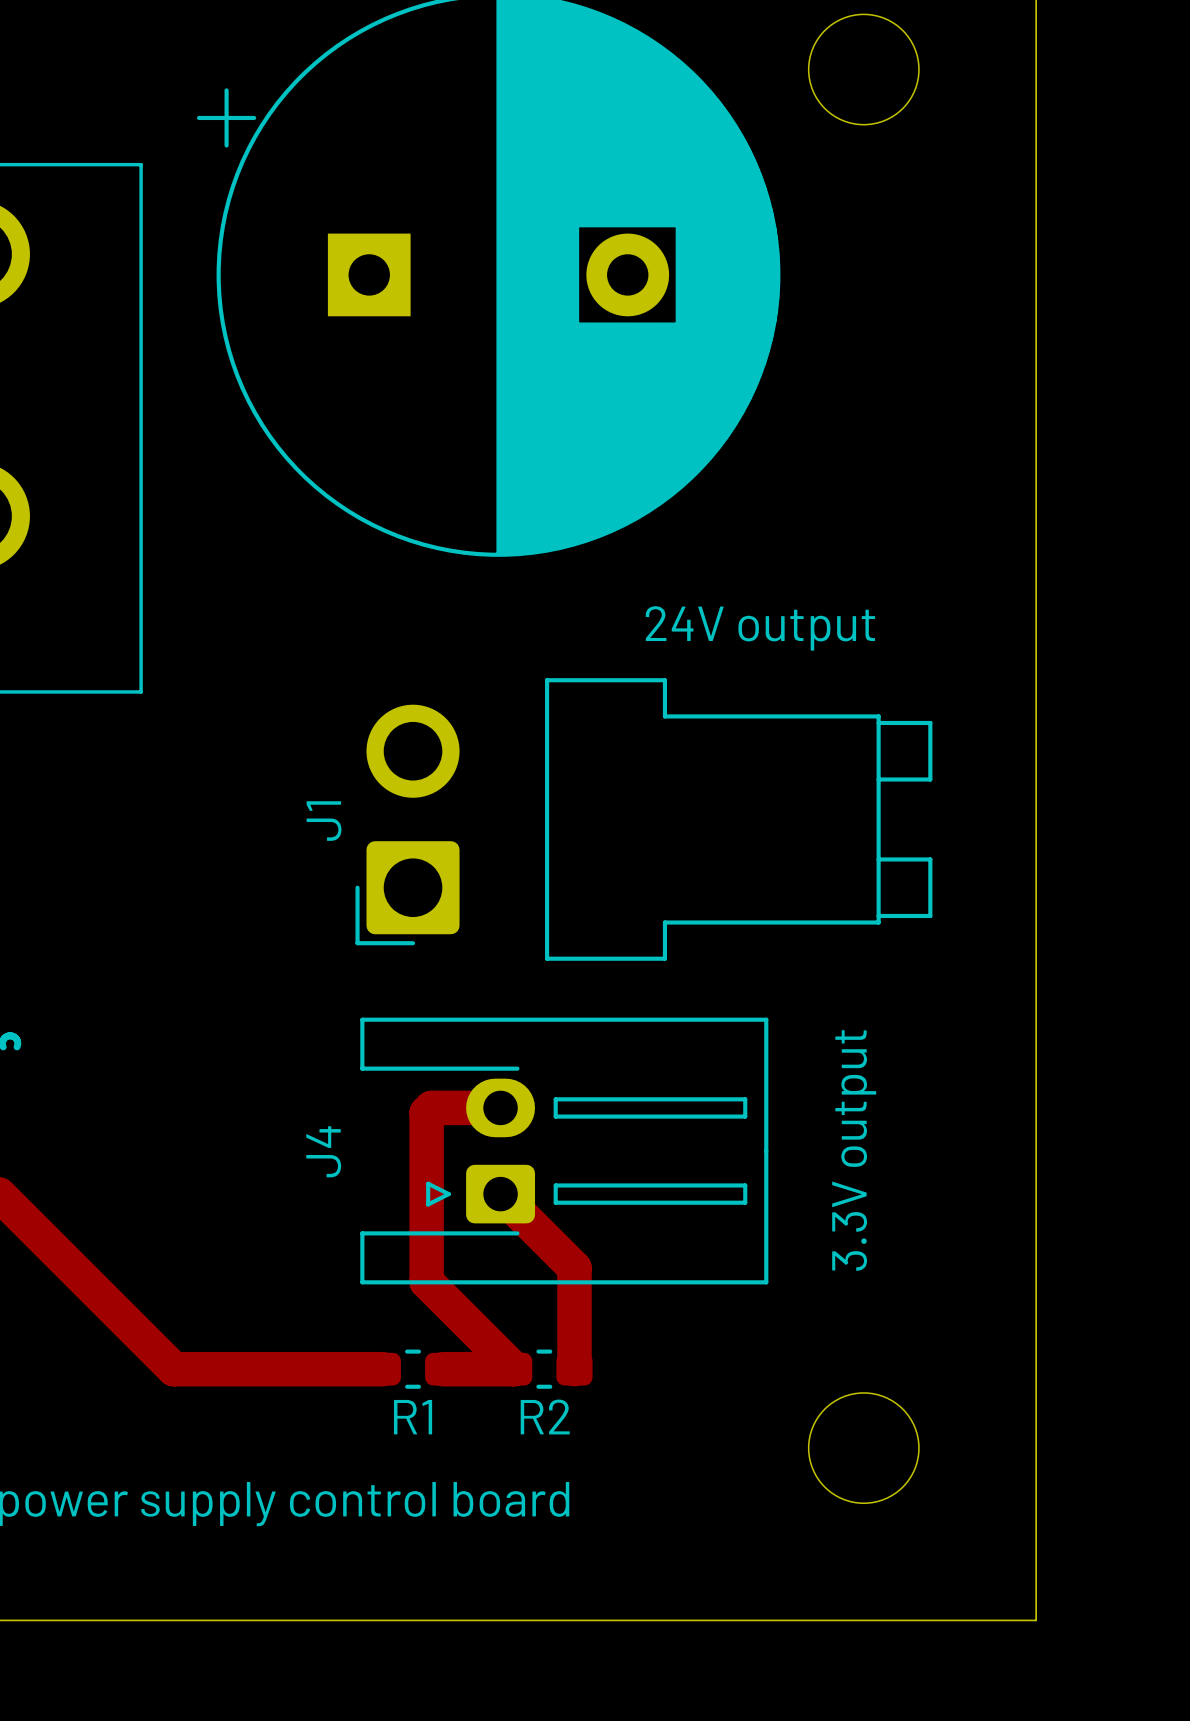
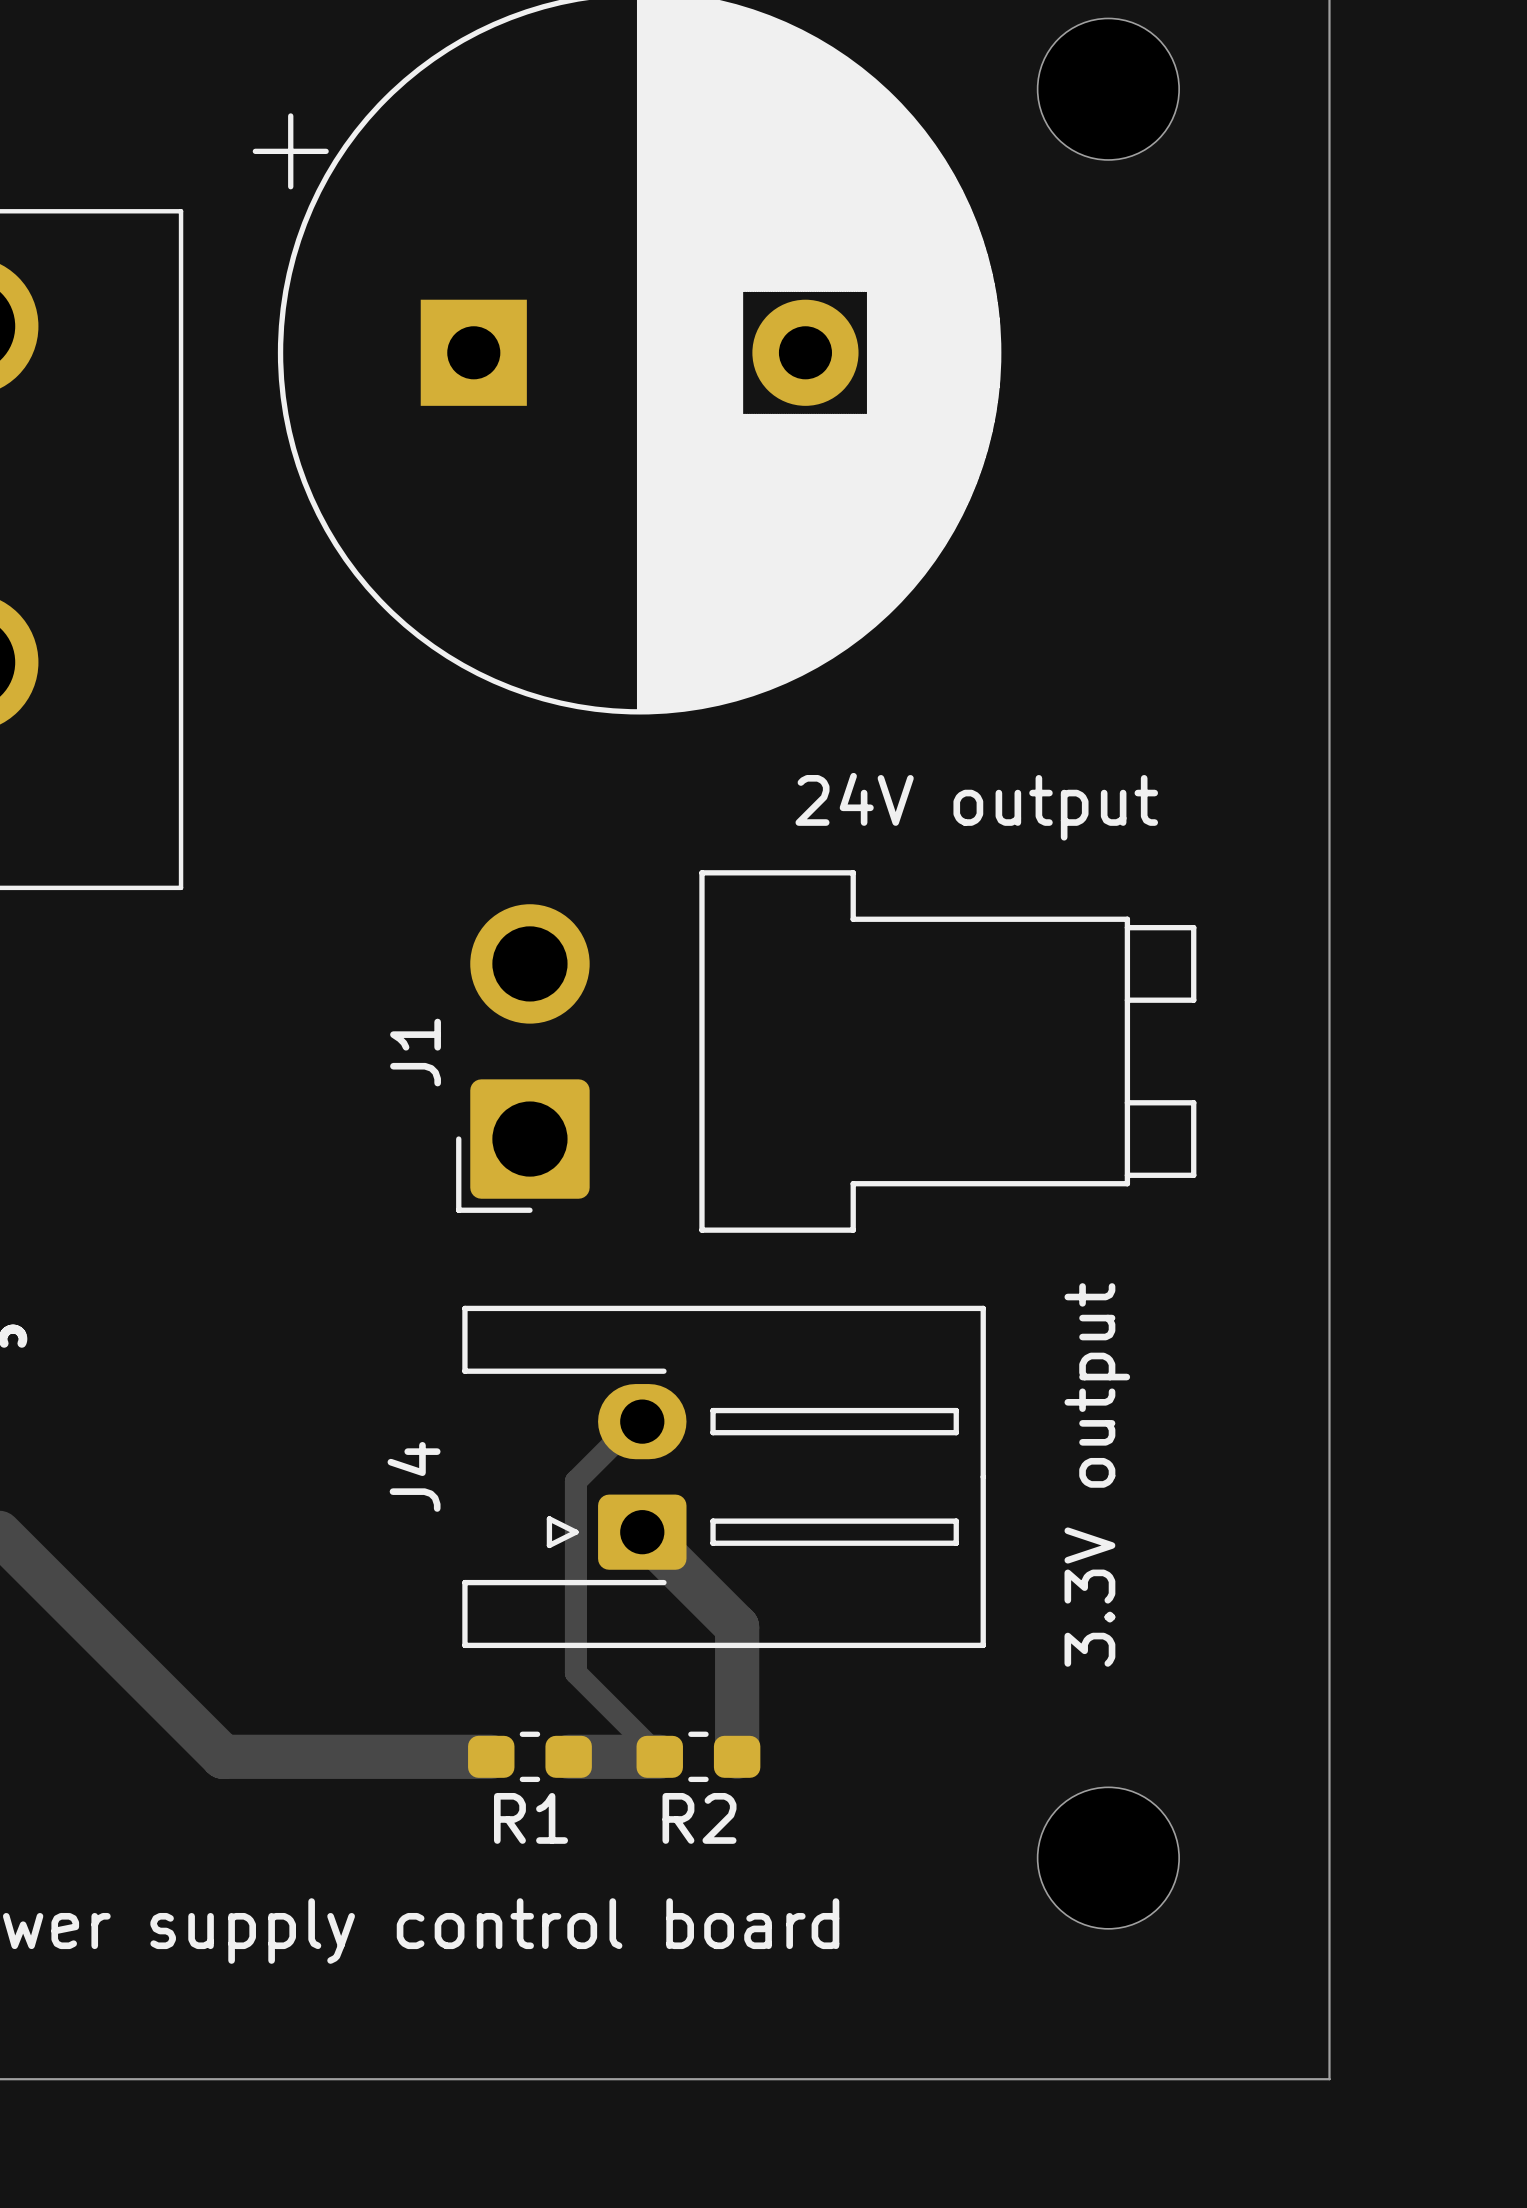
track: (500, 1107) (431, 1107) (426, 1112) (426, 1281) (448, 1303) -> (635, 1421) (575, 1481) (575, 1673)
track width: thick (448, 1303) (514, 1369) -> thin (575, 1673) (659, 1756)

